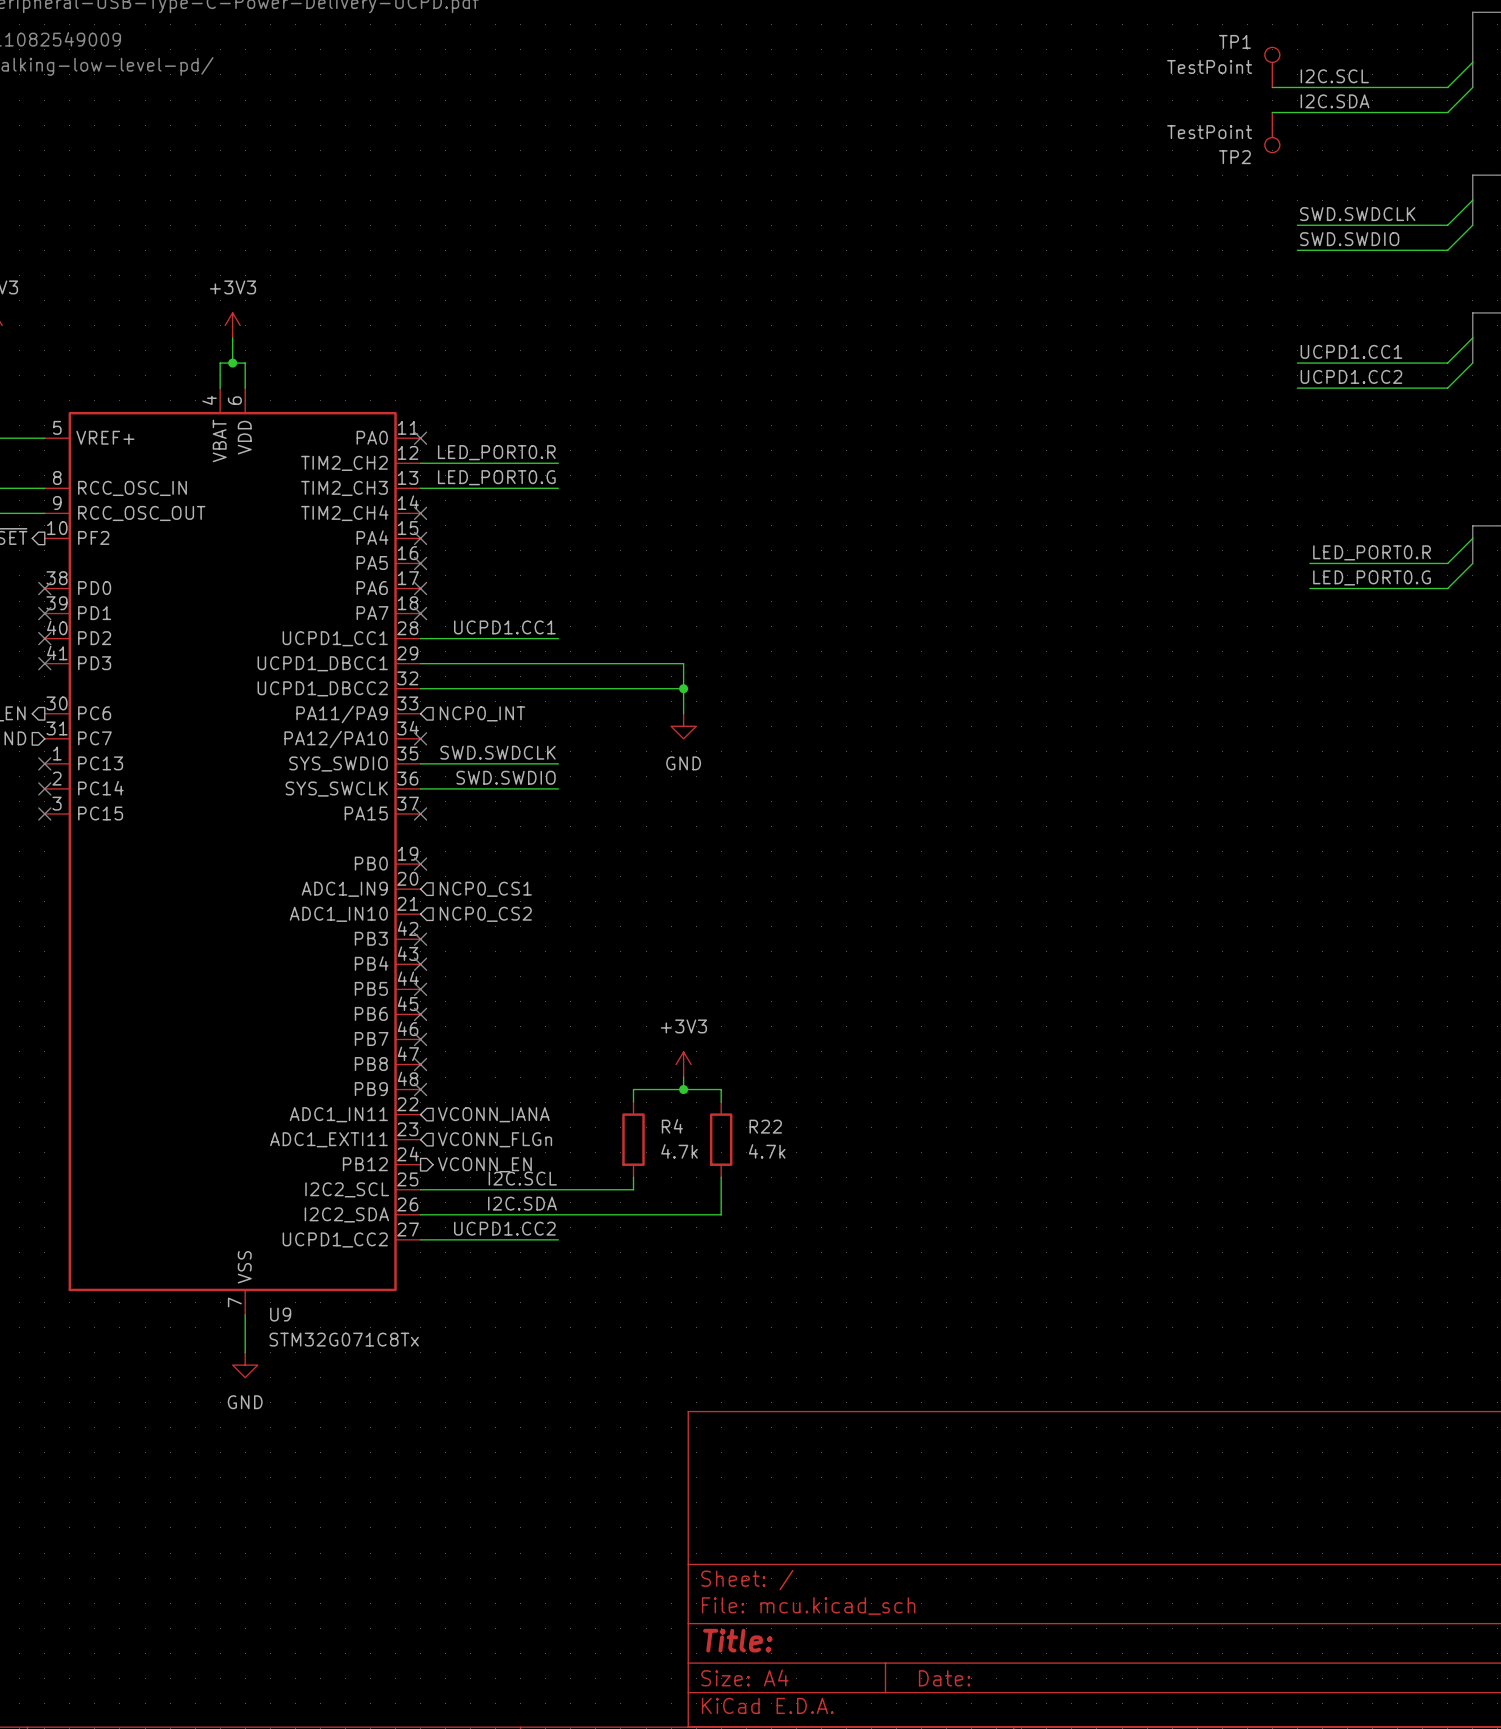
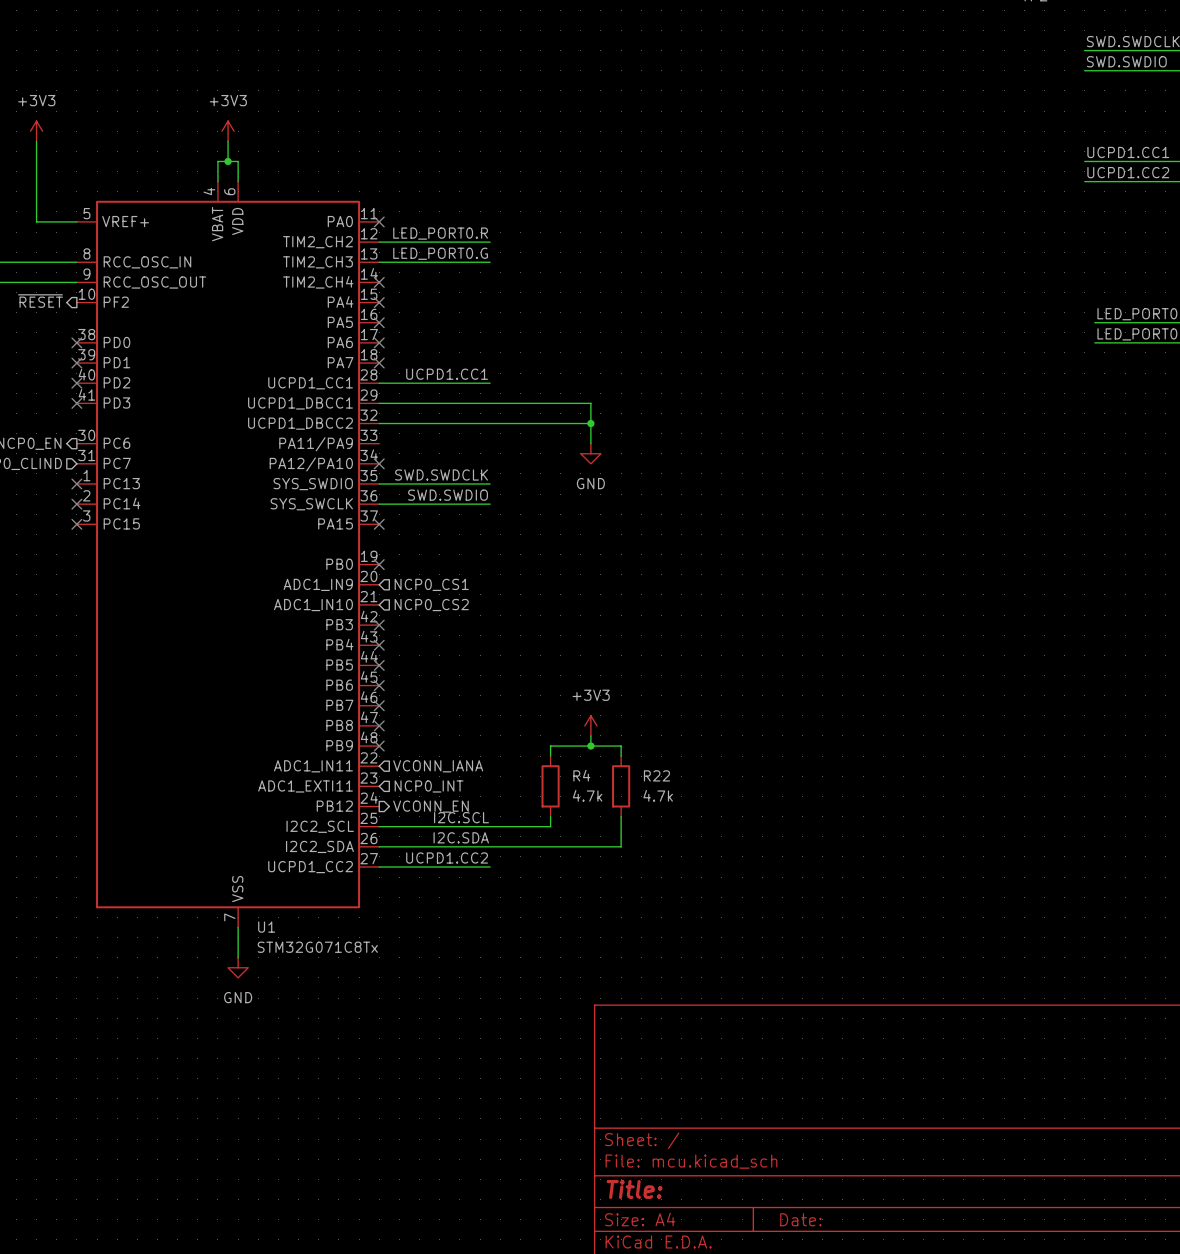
hierarchical label: NCP0_INT (482, 713) -> none
hierarchical label: VCONN_FLGn (495, 1139) -> NCP0_INT (429, 786)
U9 name: U9 (280, 1314) -> U1 (266, 927)

